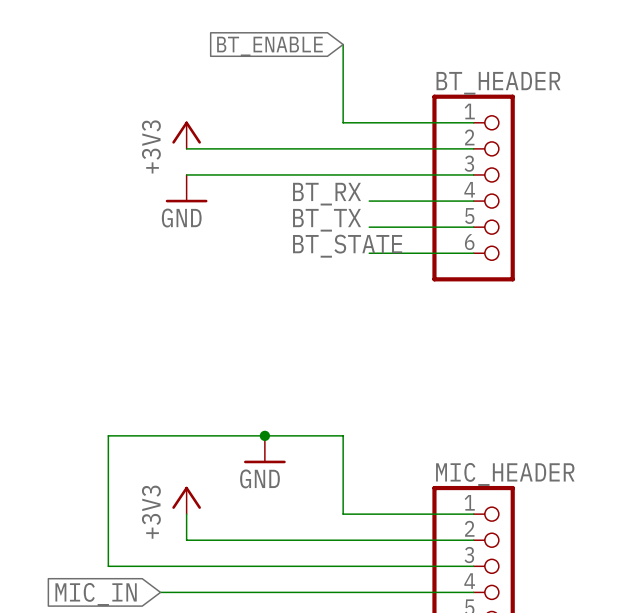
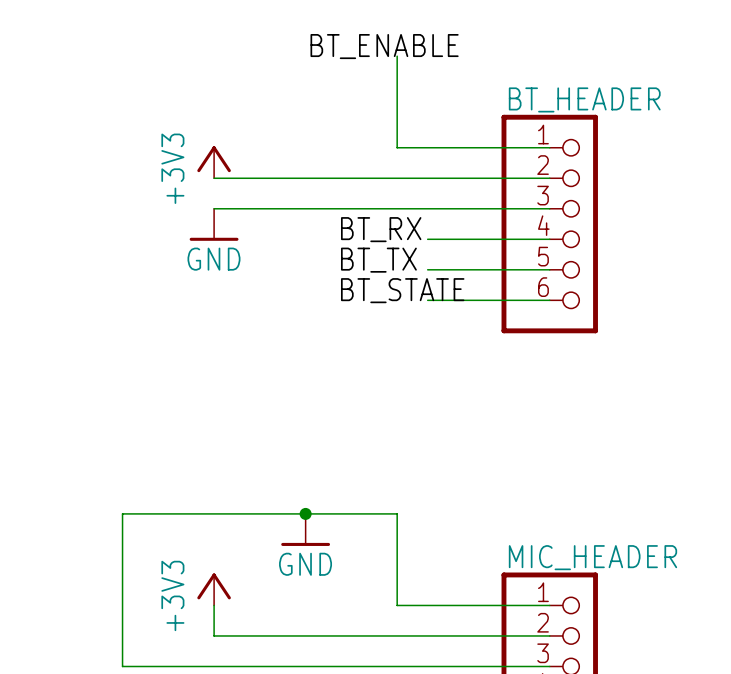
label: none -> BT_ENABLE (384, 46)
global label: BT_ENABLE (269, 46) -> none

